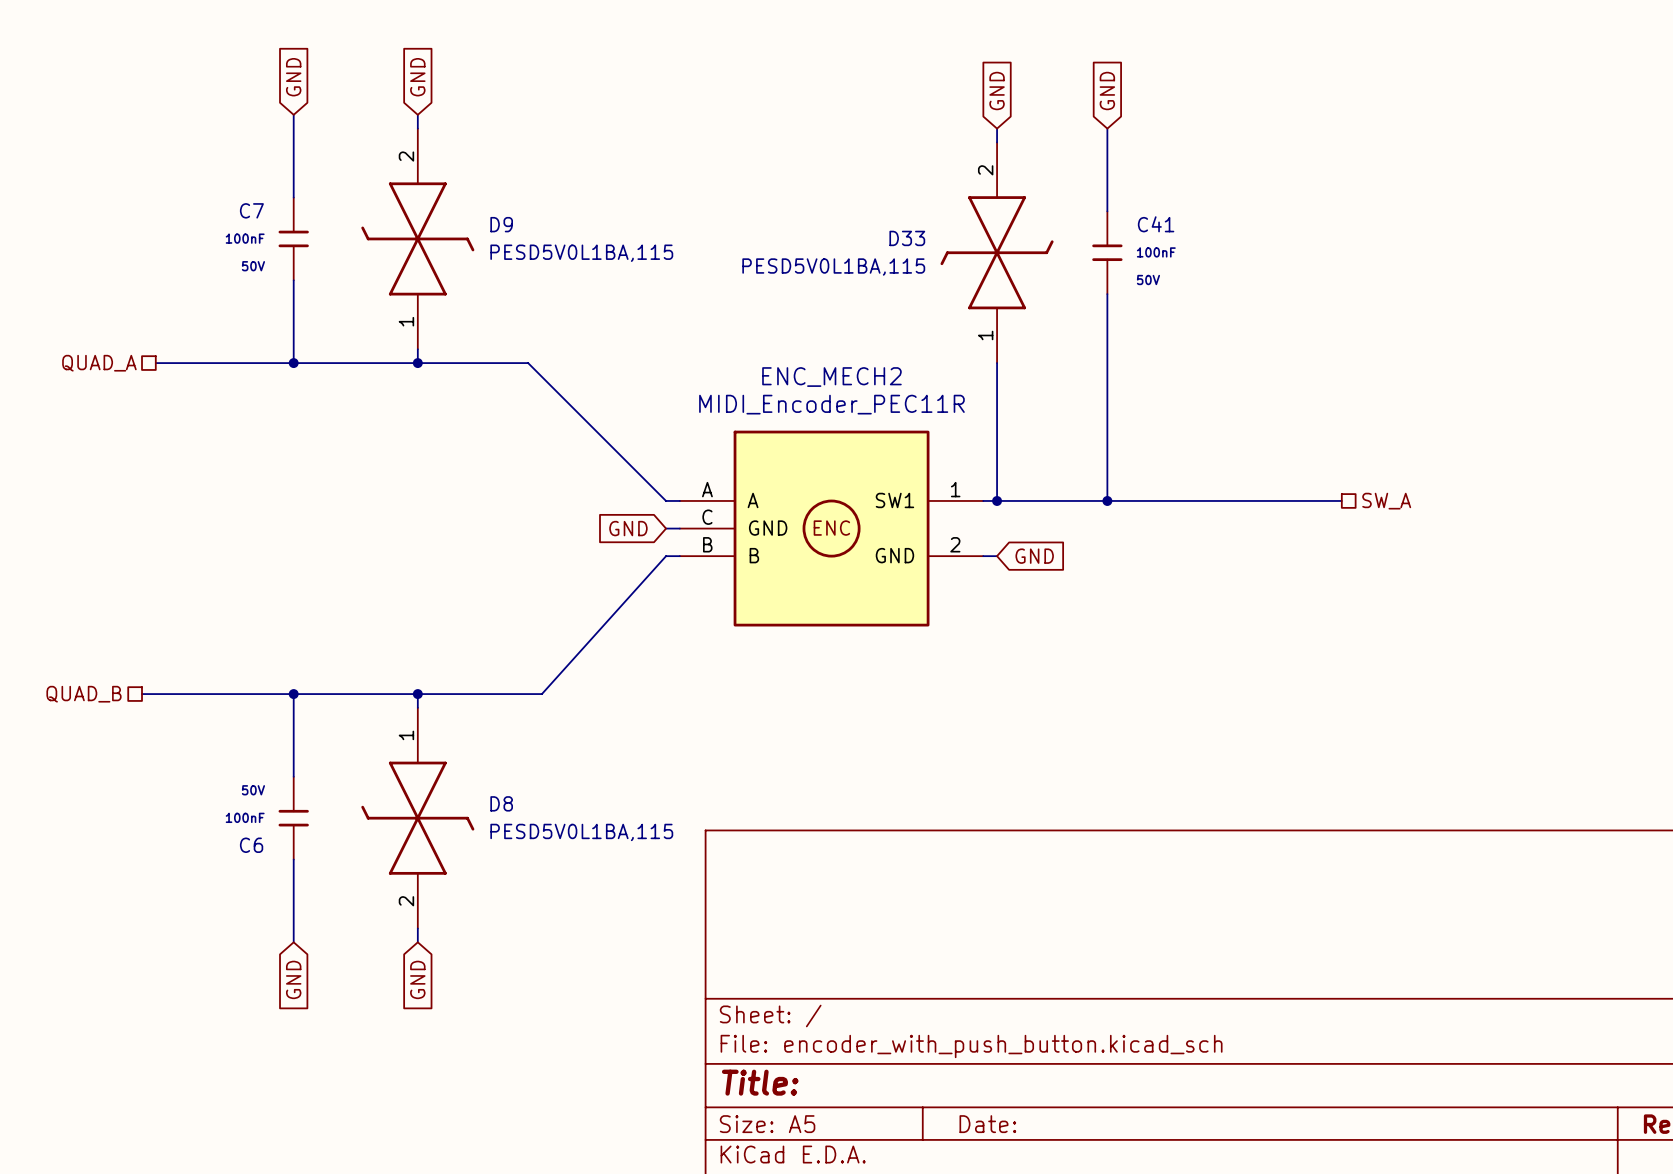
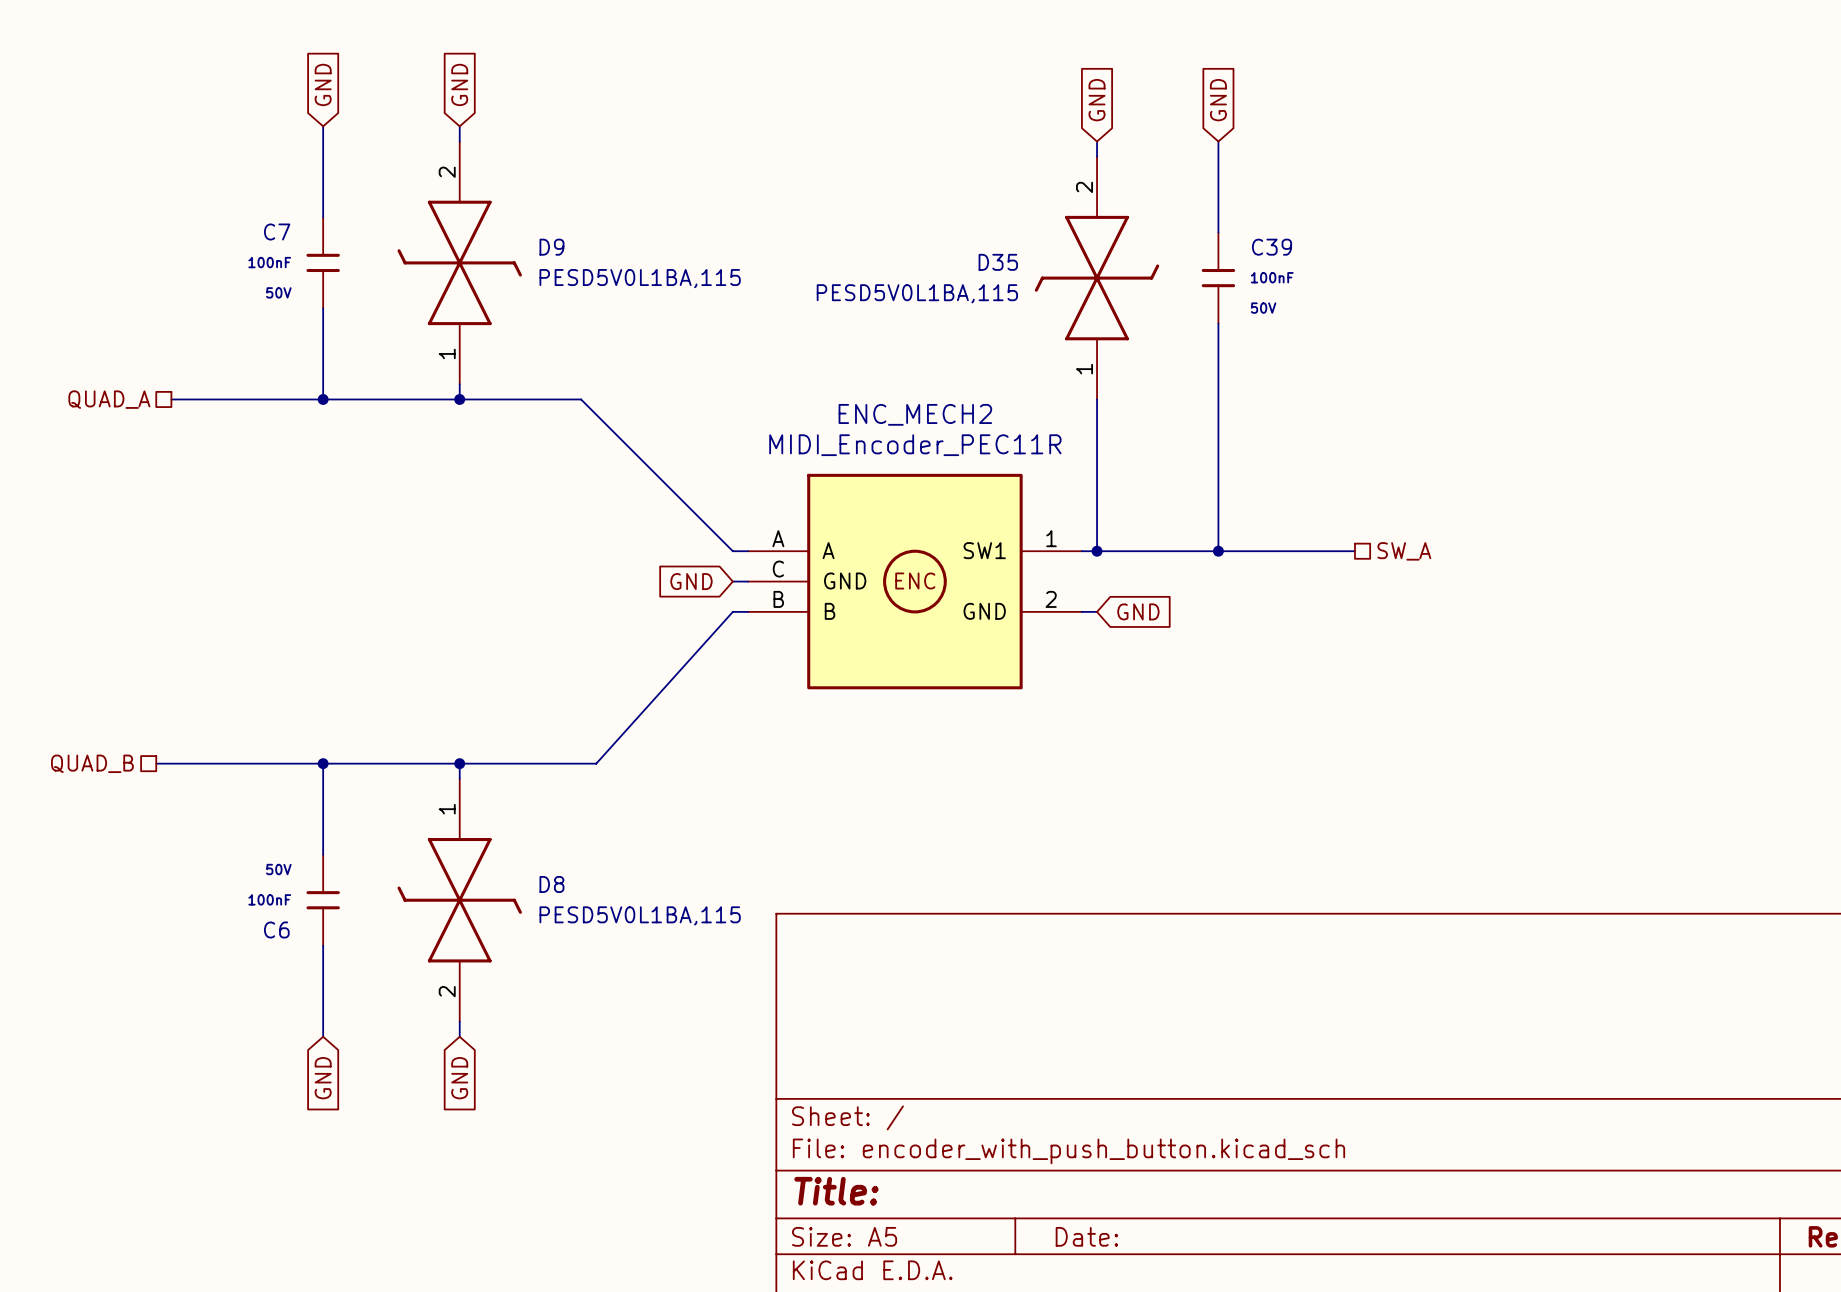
C41 name: C41 (1156, 224) -> C39 (1272, 247)
D33 name: D33 (907, 238) -> D35 (998, 262)
wire: (1231, 500) (1341, 500) -> none
hierarchical label position: SW_A (1386, 501) -> SW_A (1404, 551)

